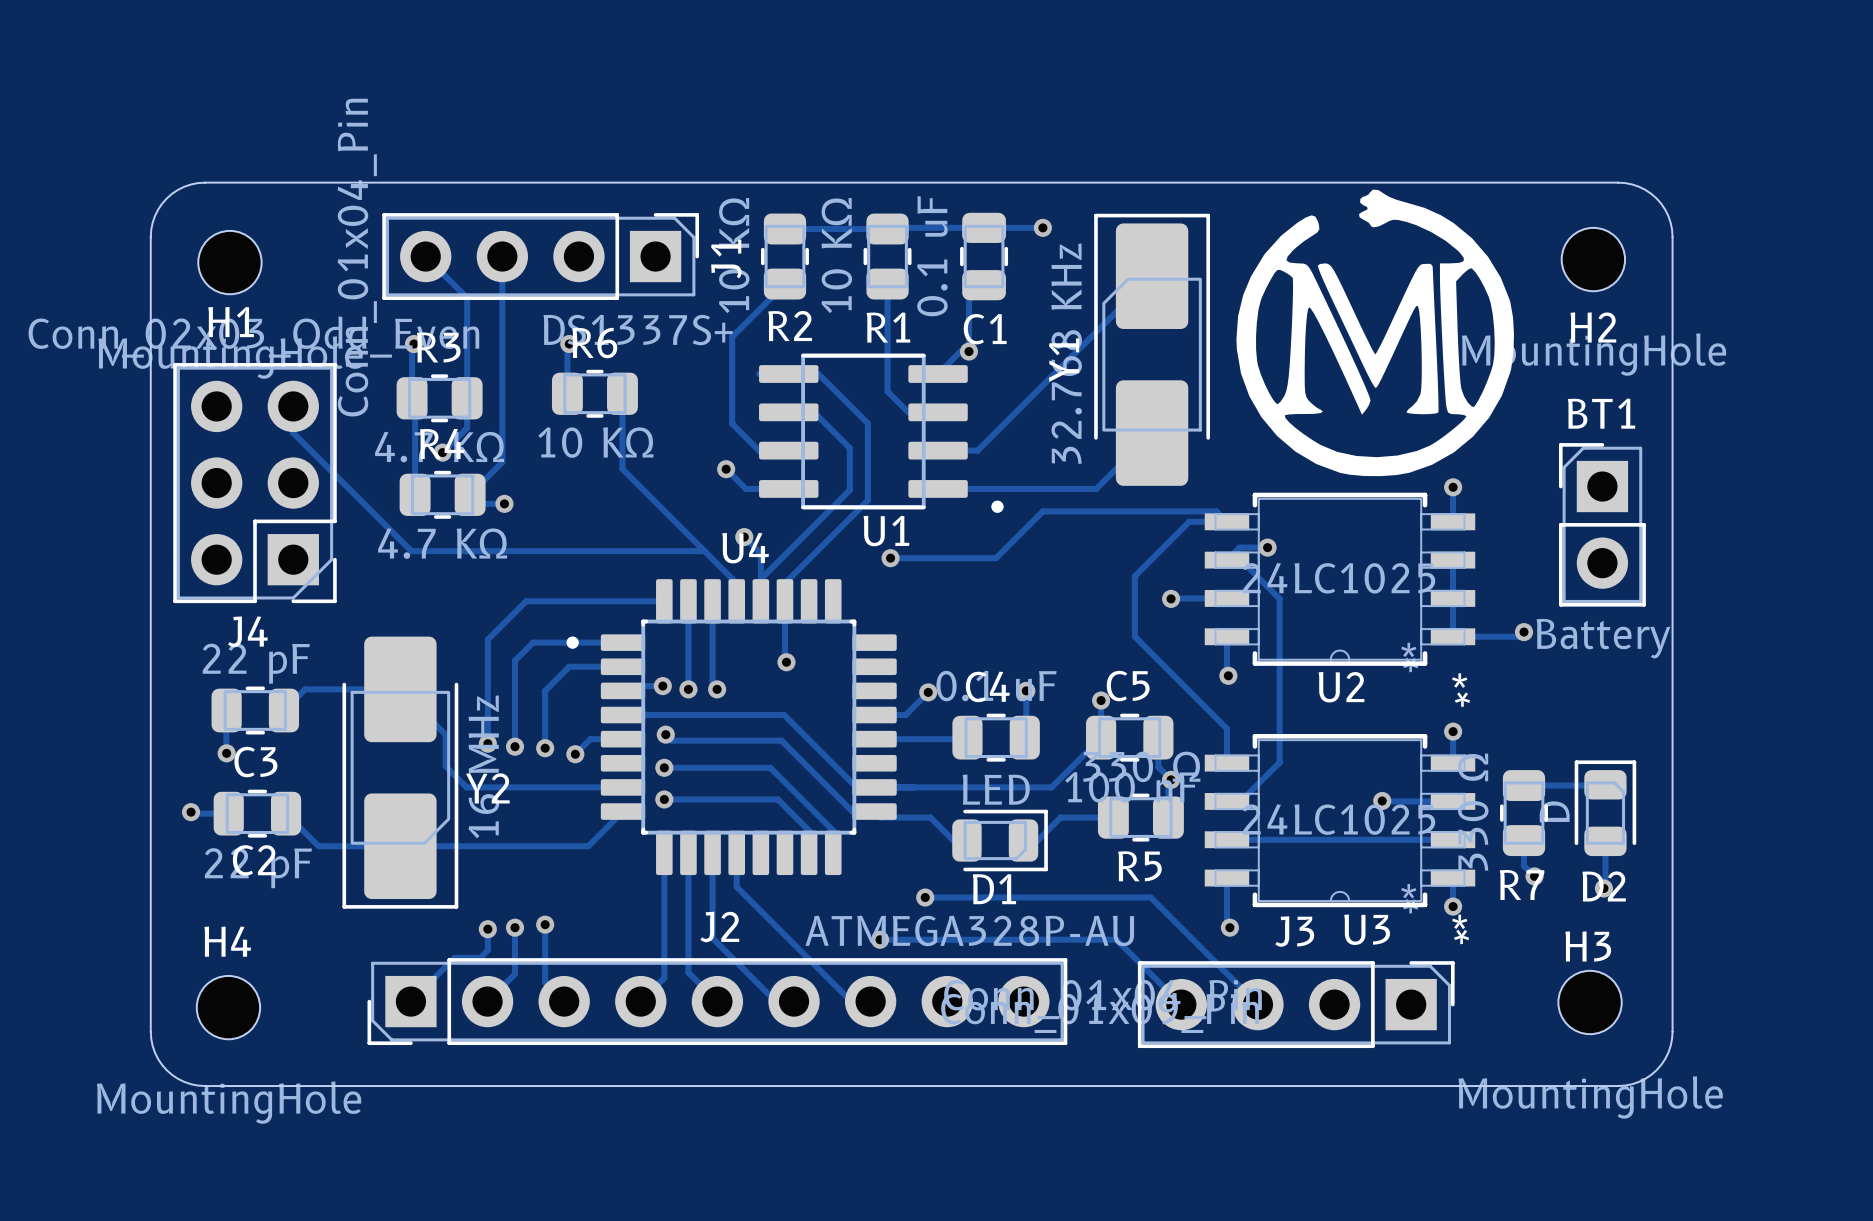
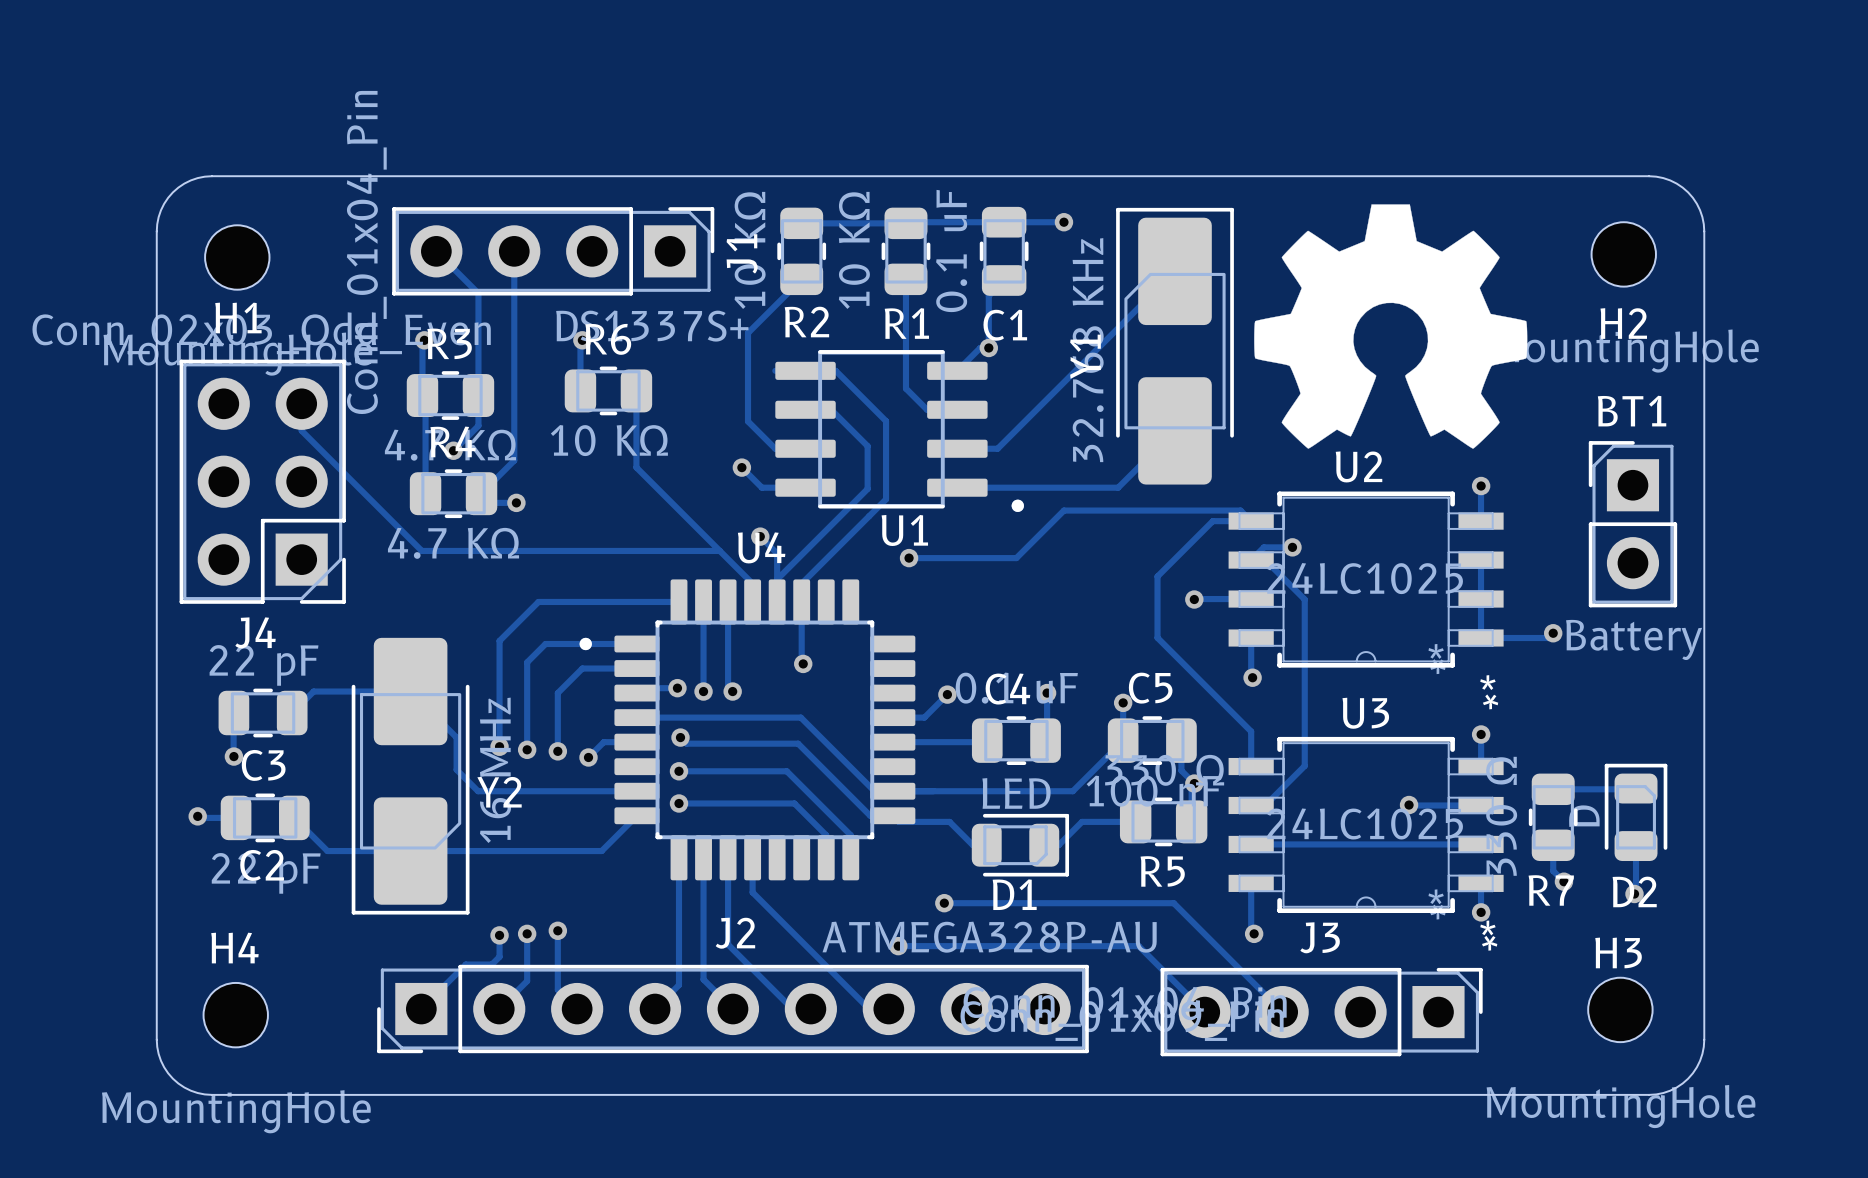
drawing shape: [1236, 189, 1515, 477] -> [1254, 204, 1528, 449]
U2 name position: U2 (1341, 687) -> U2 (1359, 466)
U3 name position: U3 (1367, 929) -> U3 (1365, 713)

